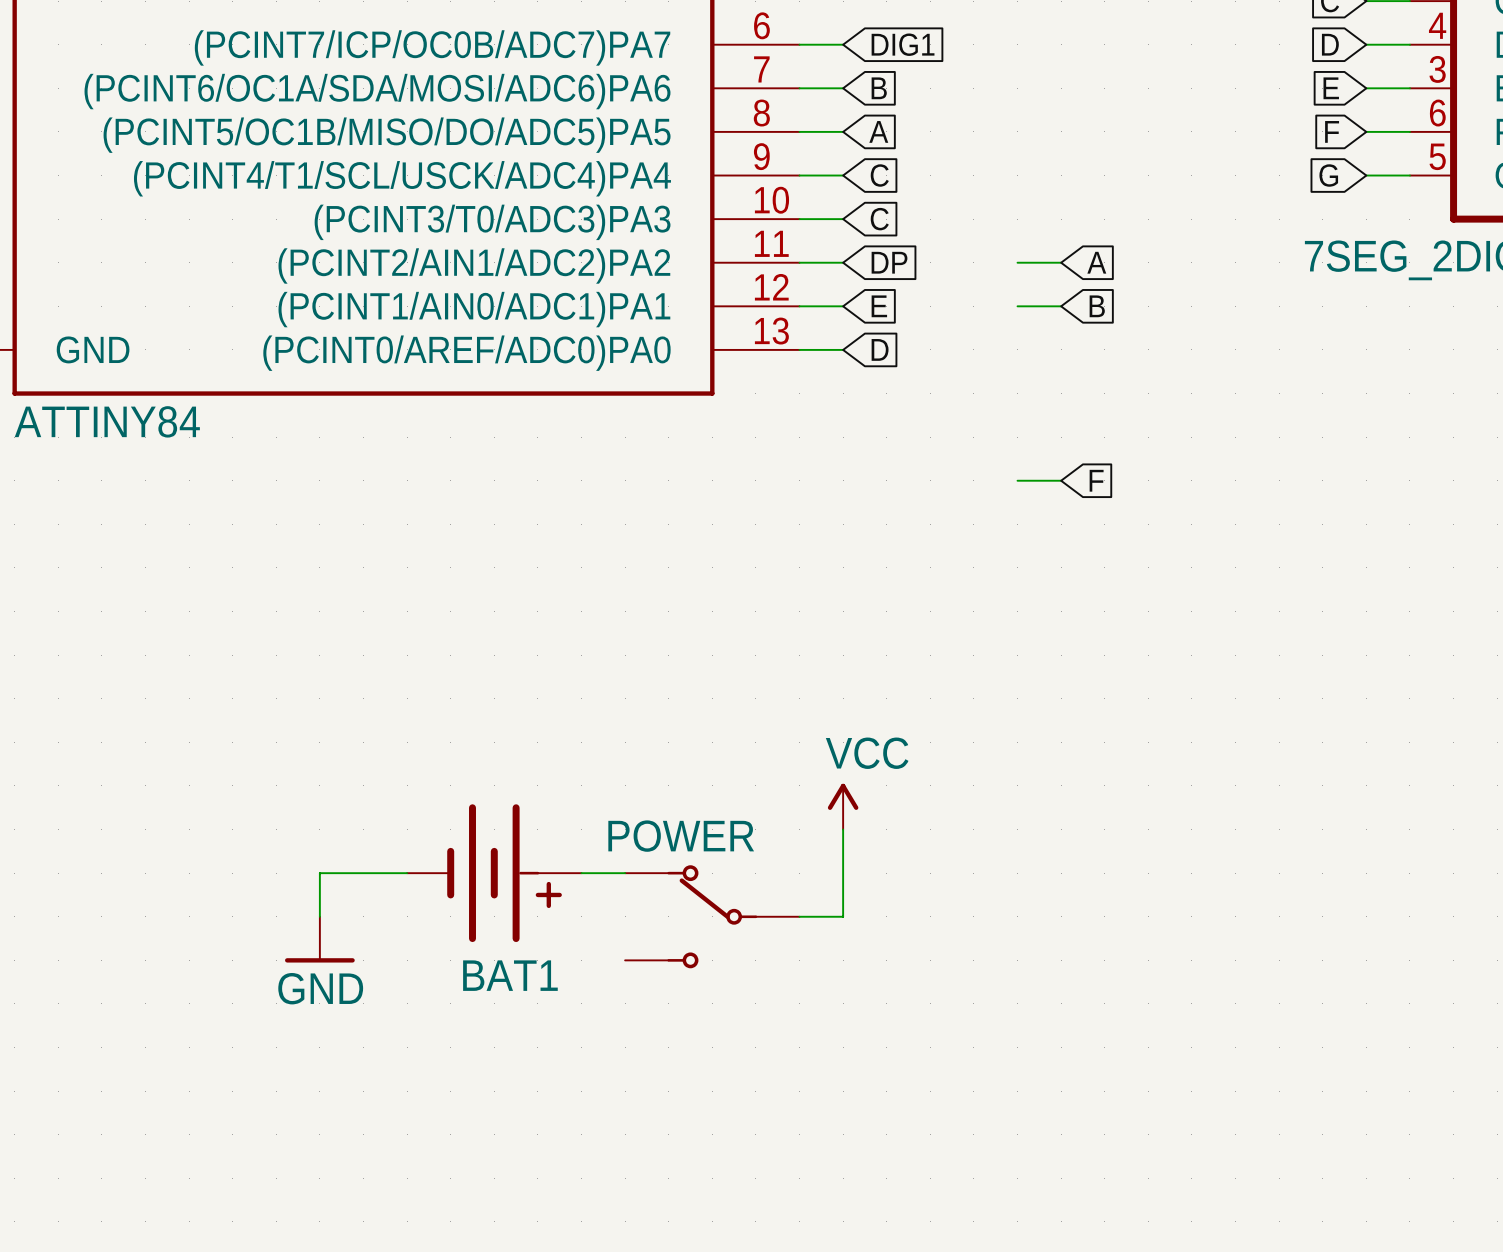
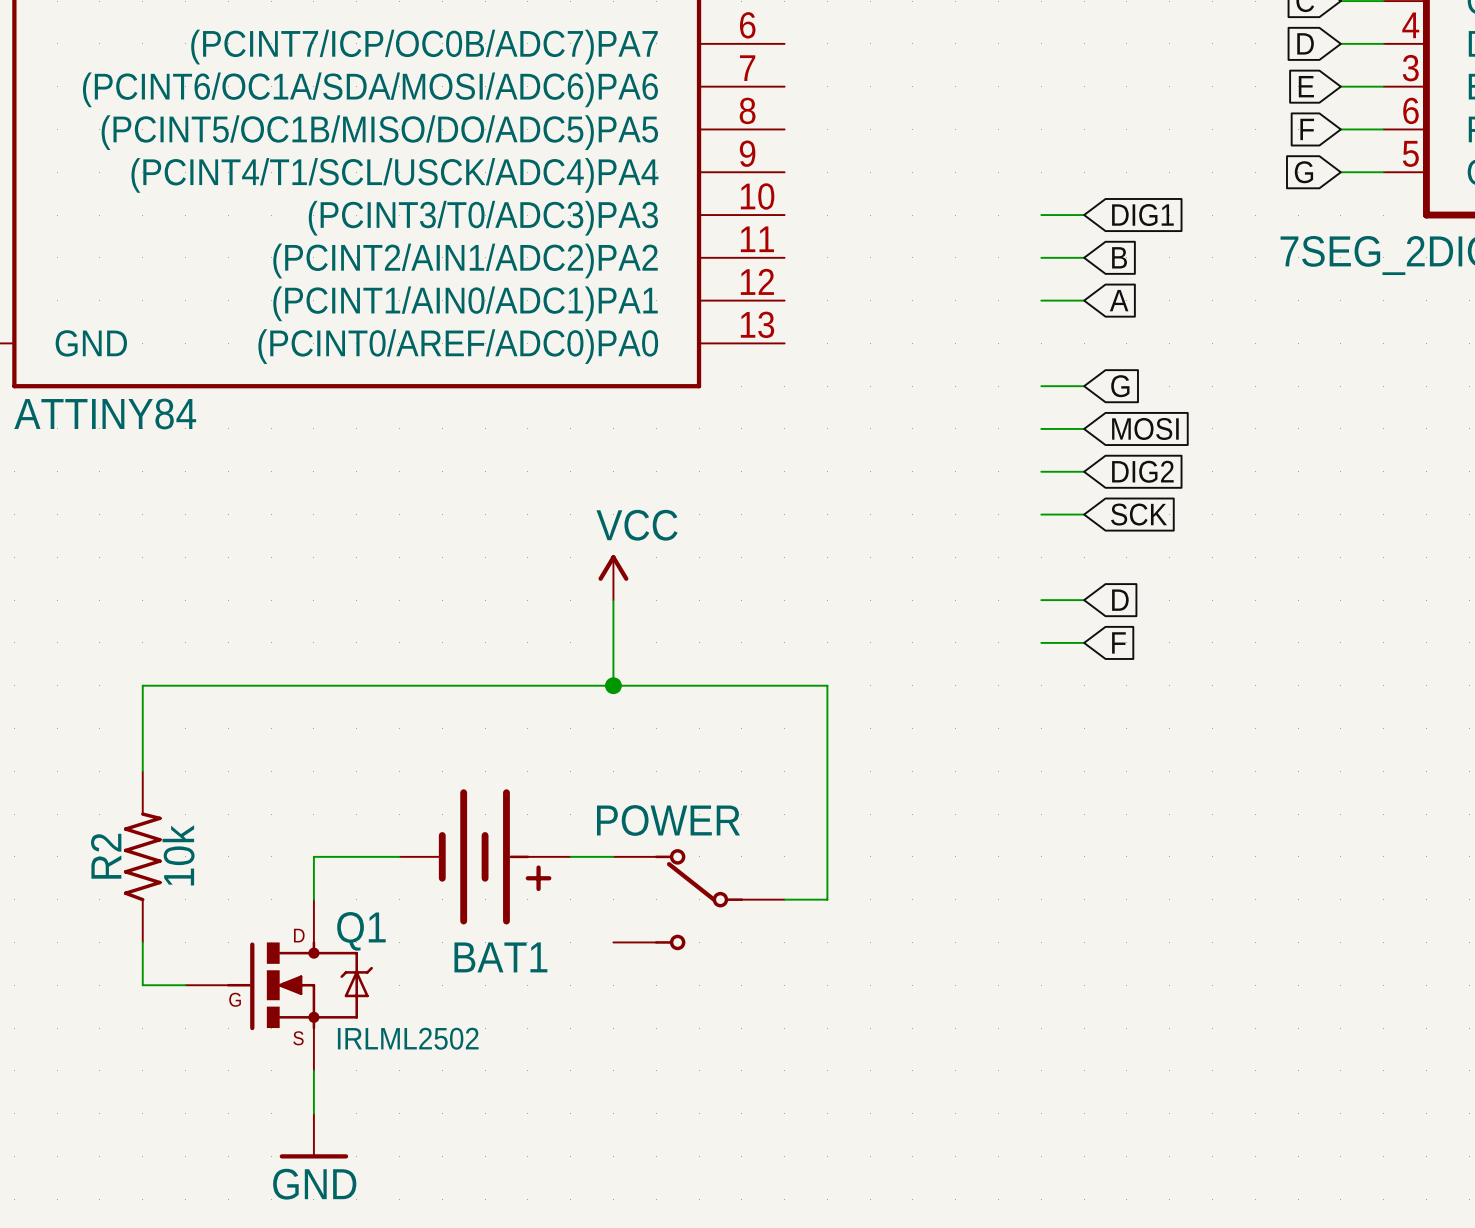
wire: (799, 44) (843, 44) -> (1041, 215) (1084, 215)
global label position: DIG1 (903, 44) -> DIG1 (1142, 215)
wire: (799, 88) (843, 88) -> none
global label: B (879, 88) -> none
wire: (799, 131) (843, 131) -> none
global label: A (878, 131) -> none
wire: (799, 175) (843, 175) -> none
global label: C (879, 175) -> none
wire: (799, 219) (843, 219) -> (1041, 386) (1084, 386)
global label: C (879, 219) -> none
wire: (799, 262) (843, 262) -> (1041, 428) (1084, 428)
global label: DP (889, 262) -> none
wire: (1017, 262) (1061, 262) -> (1084, 257) (1041, 257)
global label position: A (1096, 262) -> A (1119, 300)
wire: (799, 306) (843, 306) -> (1041, 600) (1084, 600)
global label: E (879, 306) -> none
wire: (1017, 306) (1061, 306) -> (1084, 300) (1041, 300)
global label position: B (1097, 306) -> B (1119, 257)
wire: (799, 349) (843, 349) -> (1041, 514) (1084, 514)
global label position: D (880, 349) -> D (1120, 600)
global label: none -> G (1120, 386)
global label: none -> MOSI (1145, 428)
wire: (1017, 480) (1061, 480) -> (1084, 471) (1041, 471)
global label position: F (1096, 480) -> F (1118, 642)
global label: none -> DIG2 (1142, 471)
global label: none -> SCK (1139, 514)
wire: none -> (613, 600) (613, 685)
wire: none -> (1041, 642) (1084, 642)
junction: none -> (613, 685)
wire: none -> (142, 771) (142, 685) (827, 685) (827, 814)
power symbol position: VCC (843, 806) -> VCC (613, 577)
R2: none -> 10k (142, 856)
power symbol position: GND (319, 939) -> GND (313, 1136)
wire: none -> (142, 942) (142, 985) (185, 985)
Q1: none -> IRLML2502 (279, 985)
wire: none -> (313, 1070) (313, 1113)

